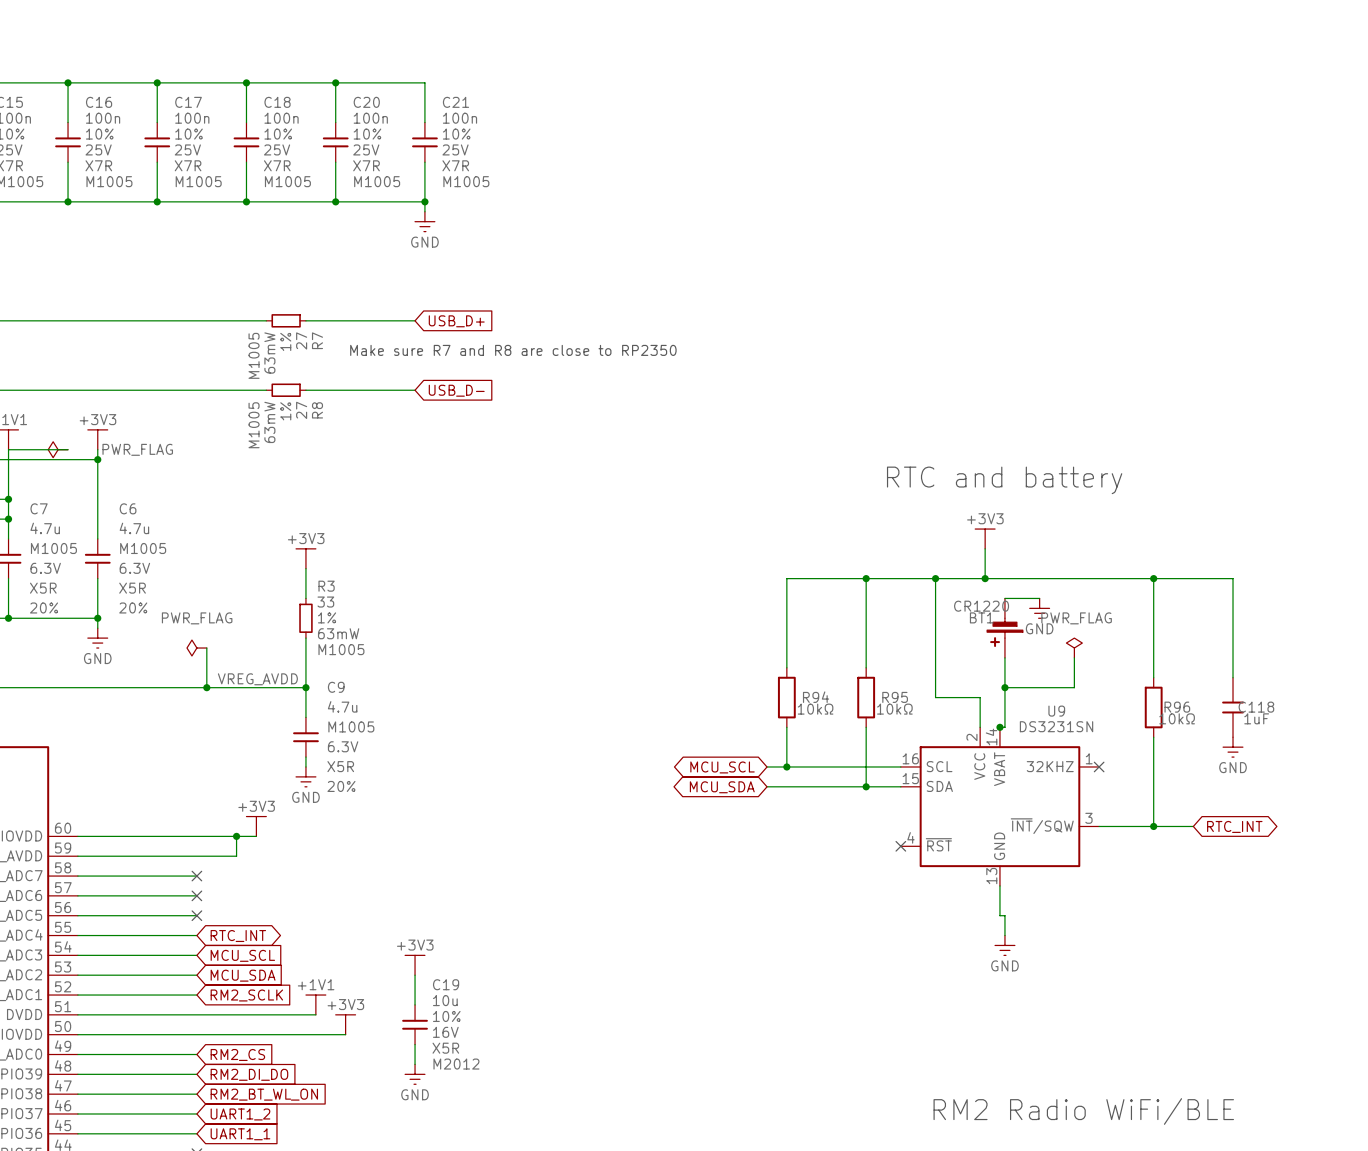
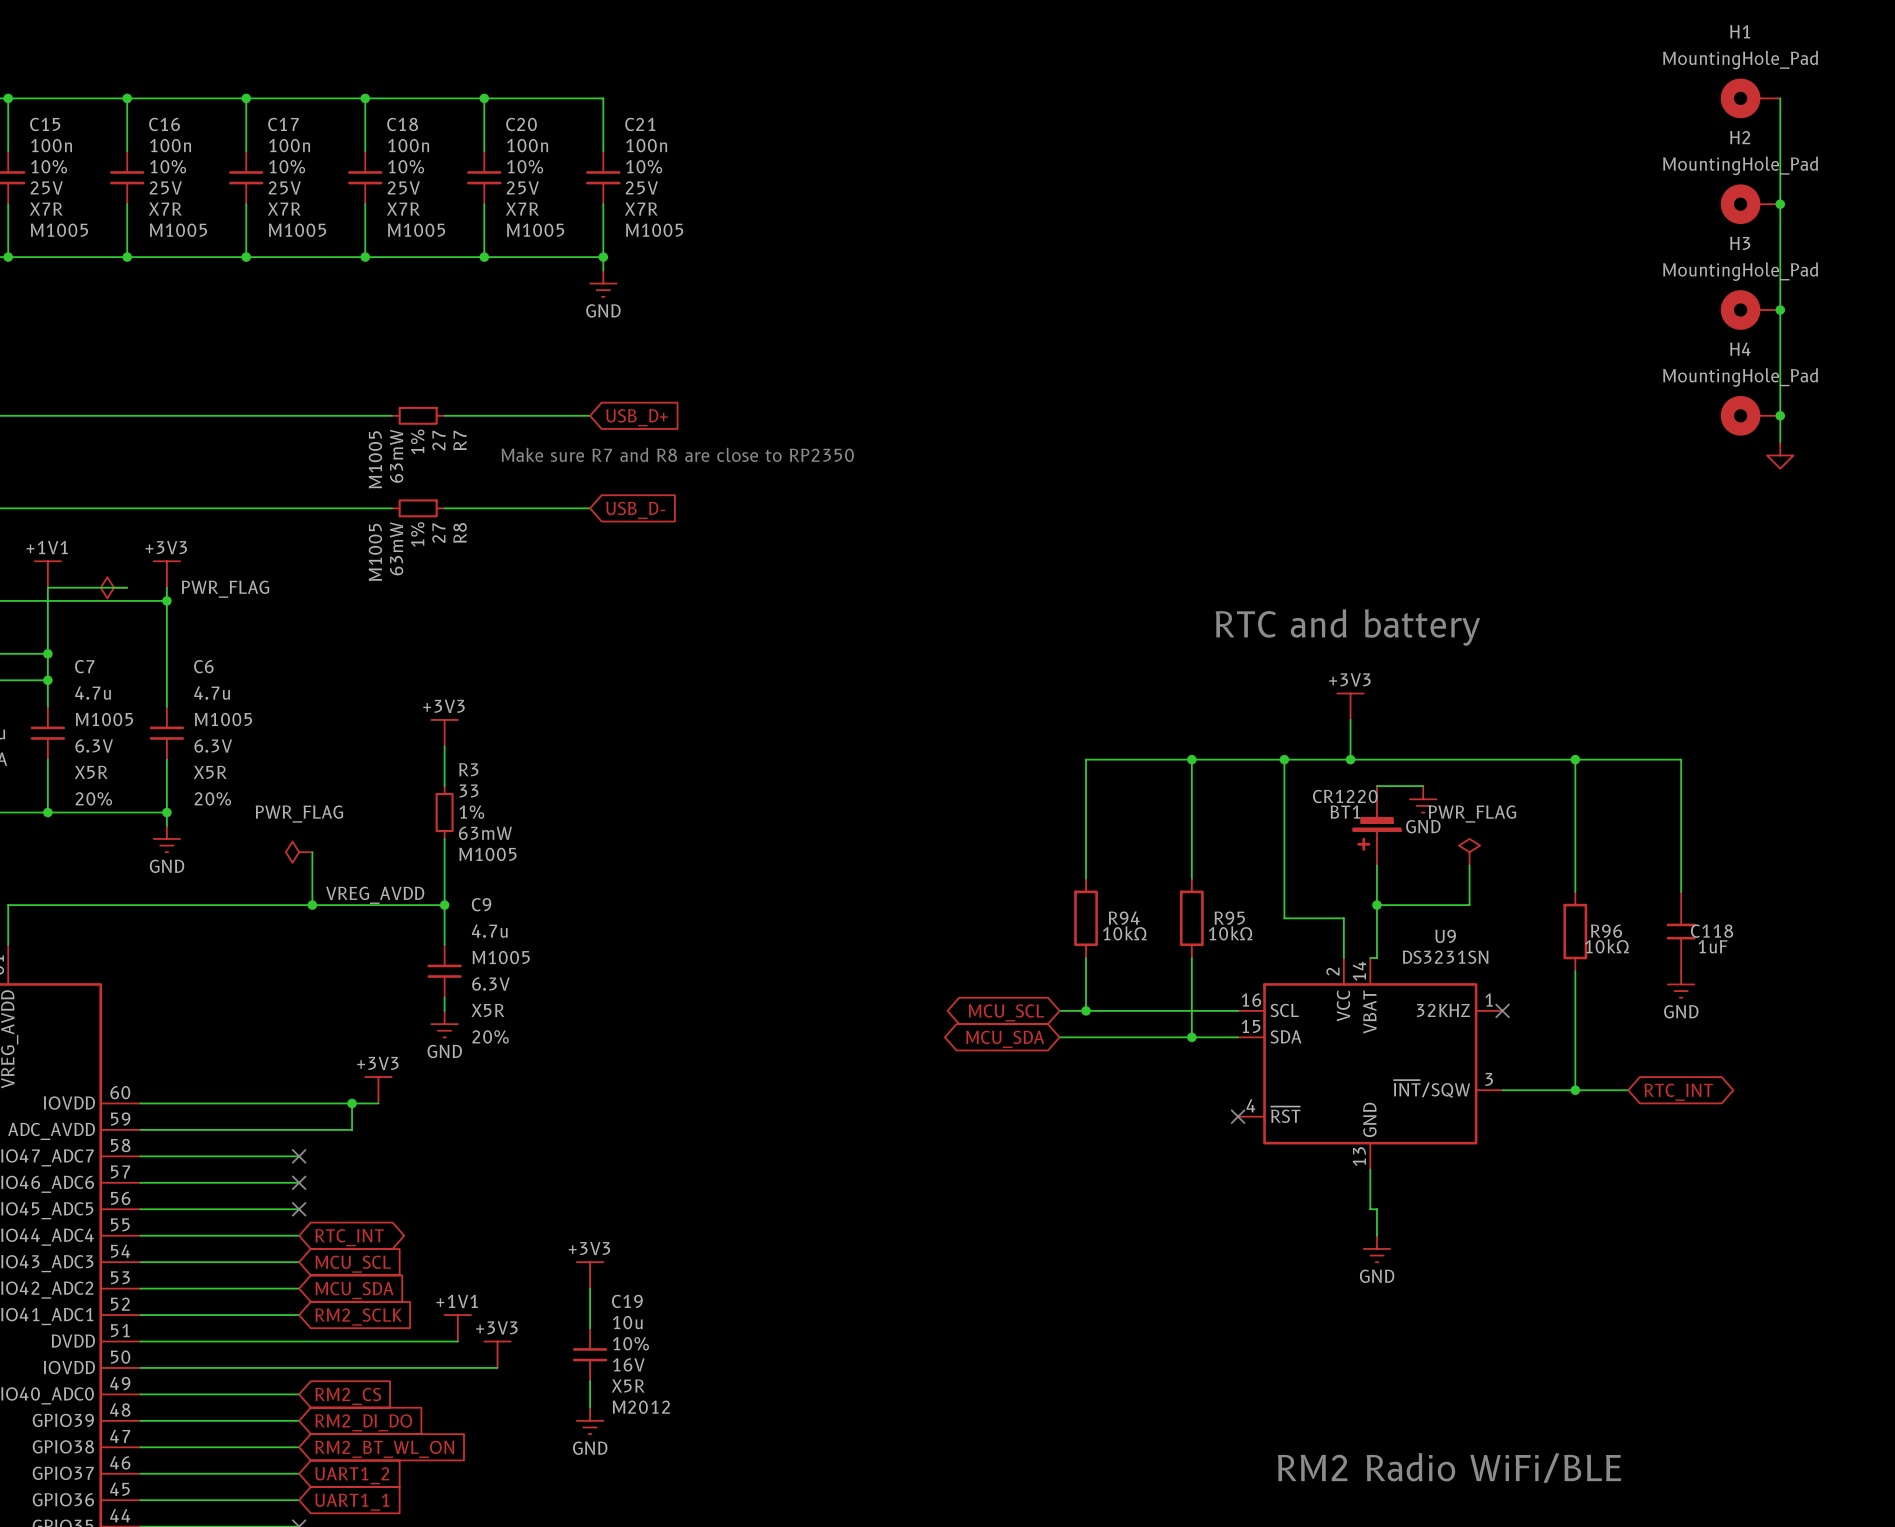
H1: none -> MountingHole_Pad (1750, 98)
wire: none -> (1780, 98) (1780, 442)
H2: none -> MountingHole_Pad (1750, 204)
junction: none -> (1780, 204)
H3: none -> MountingHole_Pad (1750, 310)
junction: none -> (1780, 310)
H4: none -> MountingHole_Pad (1750, 415)
junction: none -> (1780, 415)
power symbol: none -> (1780, 455)
junction: (999, 727) -> none

